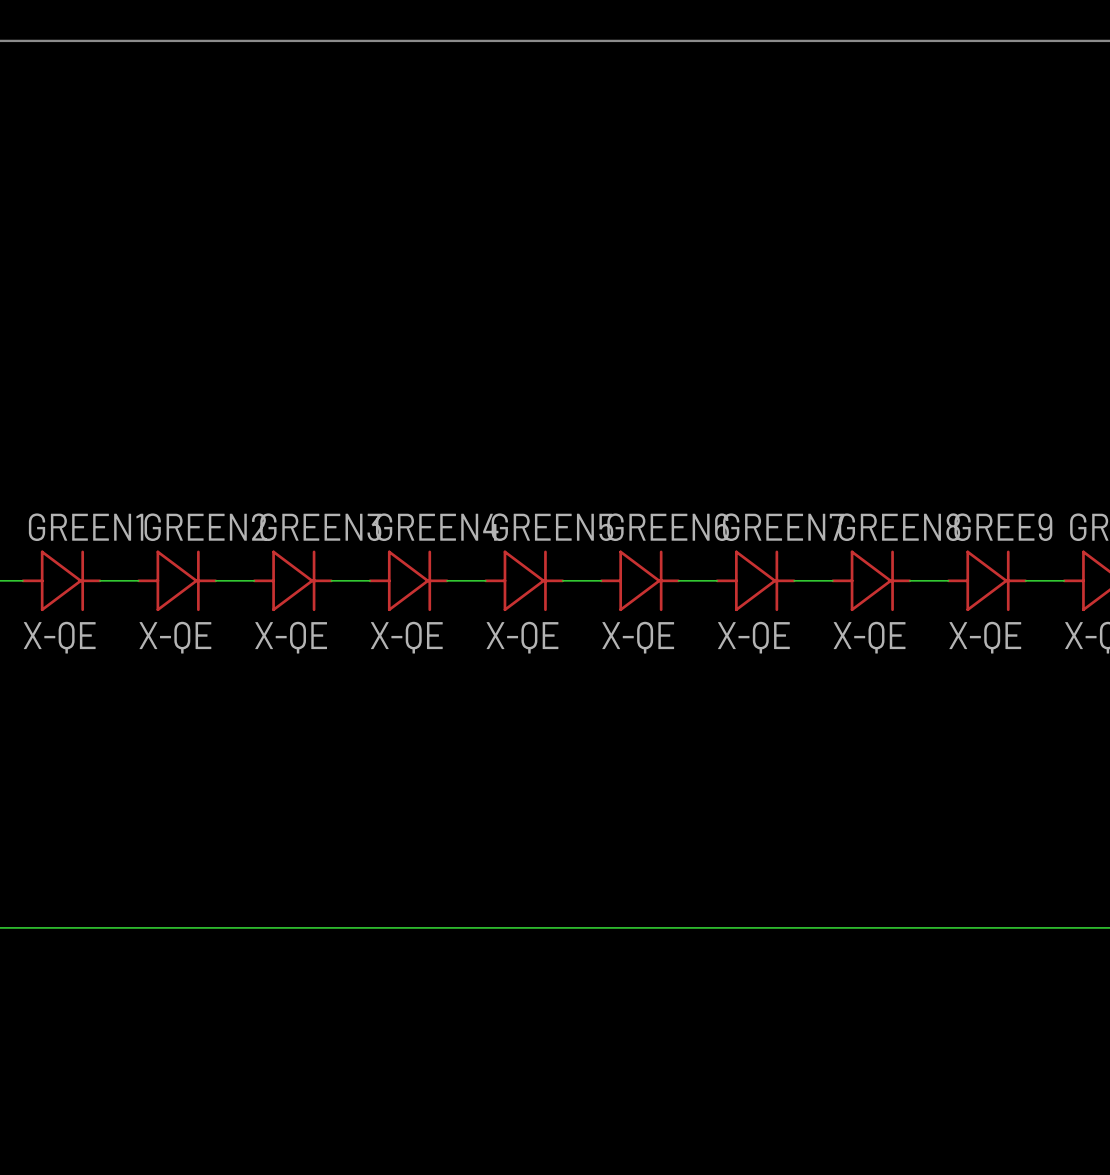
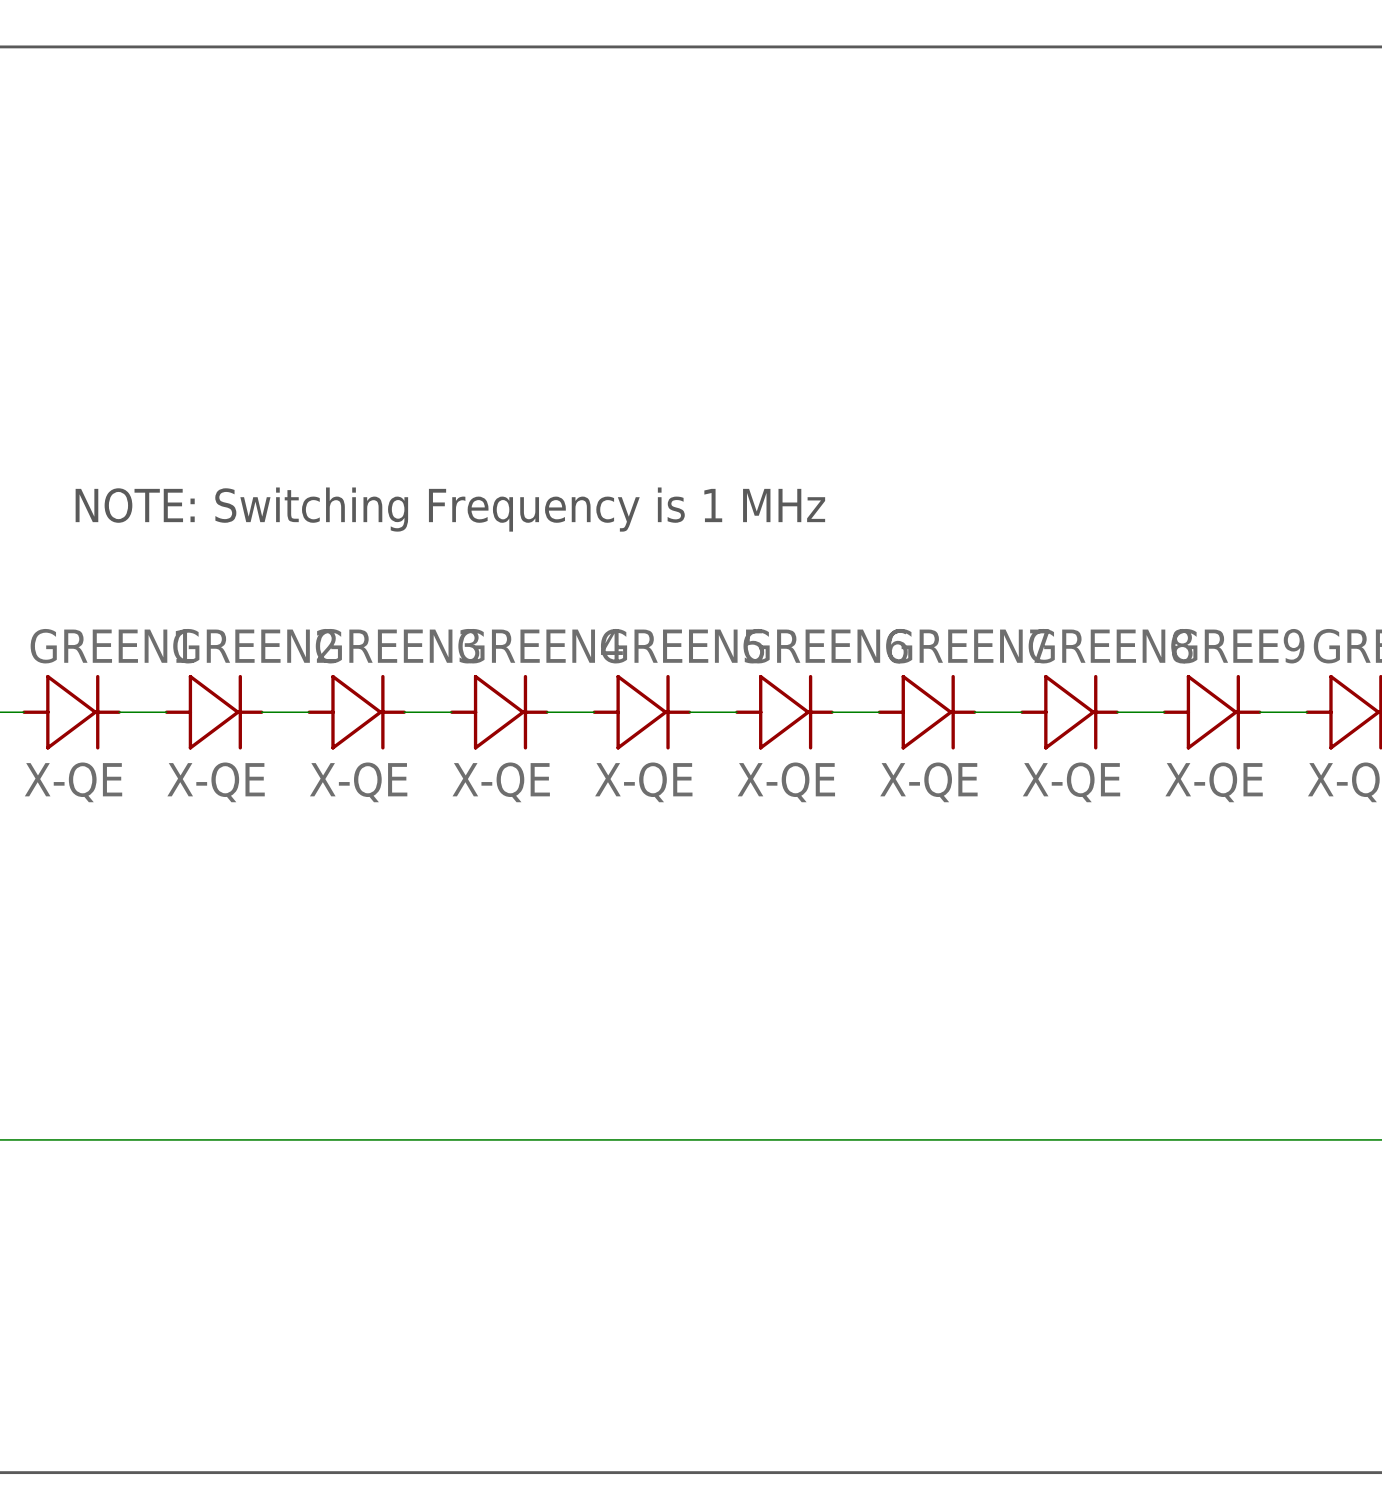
text: none -> NOTE: Switching Frequency is 1 MHz (450, 509)

